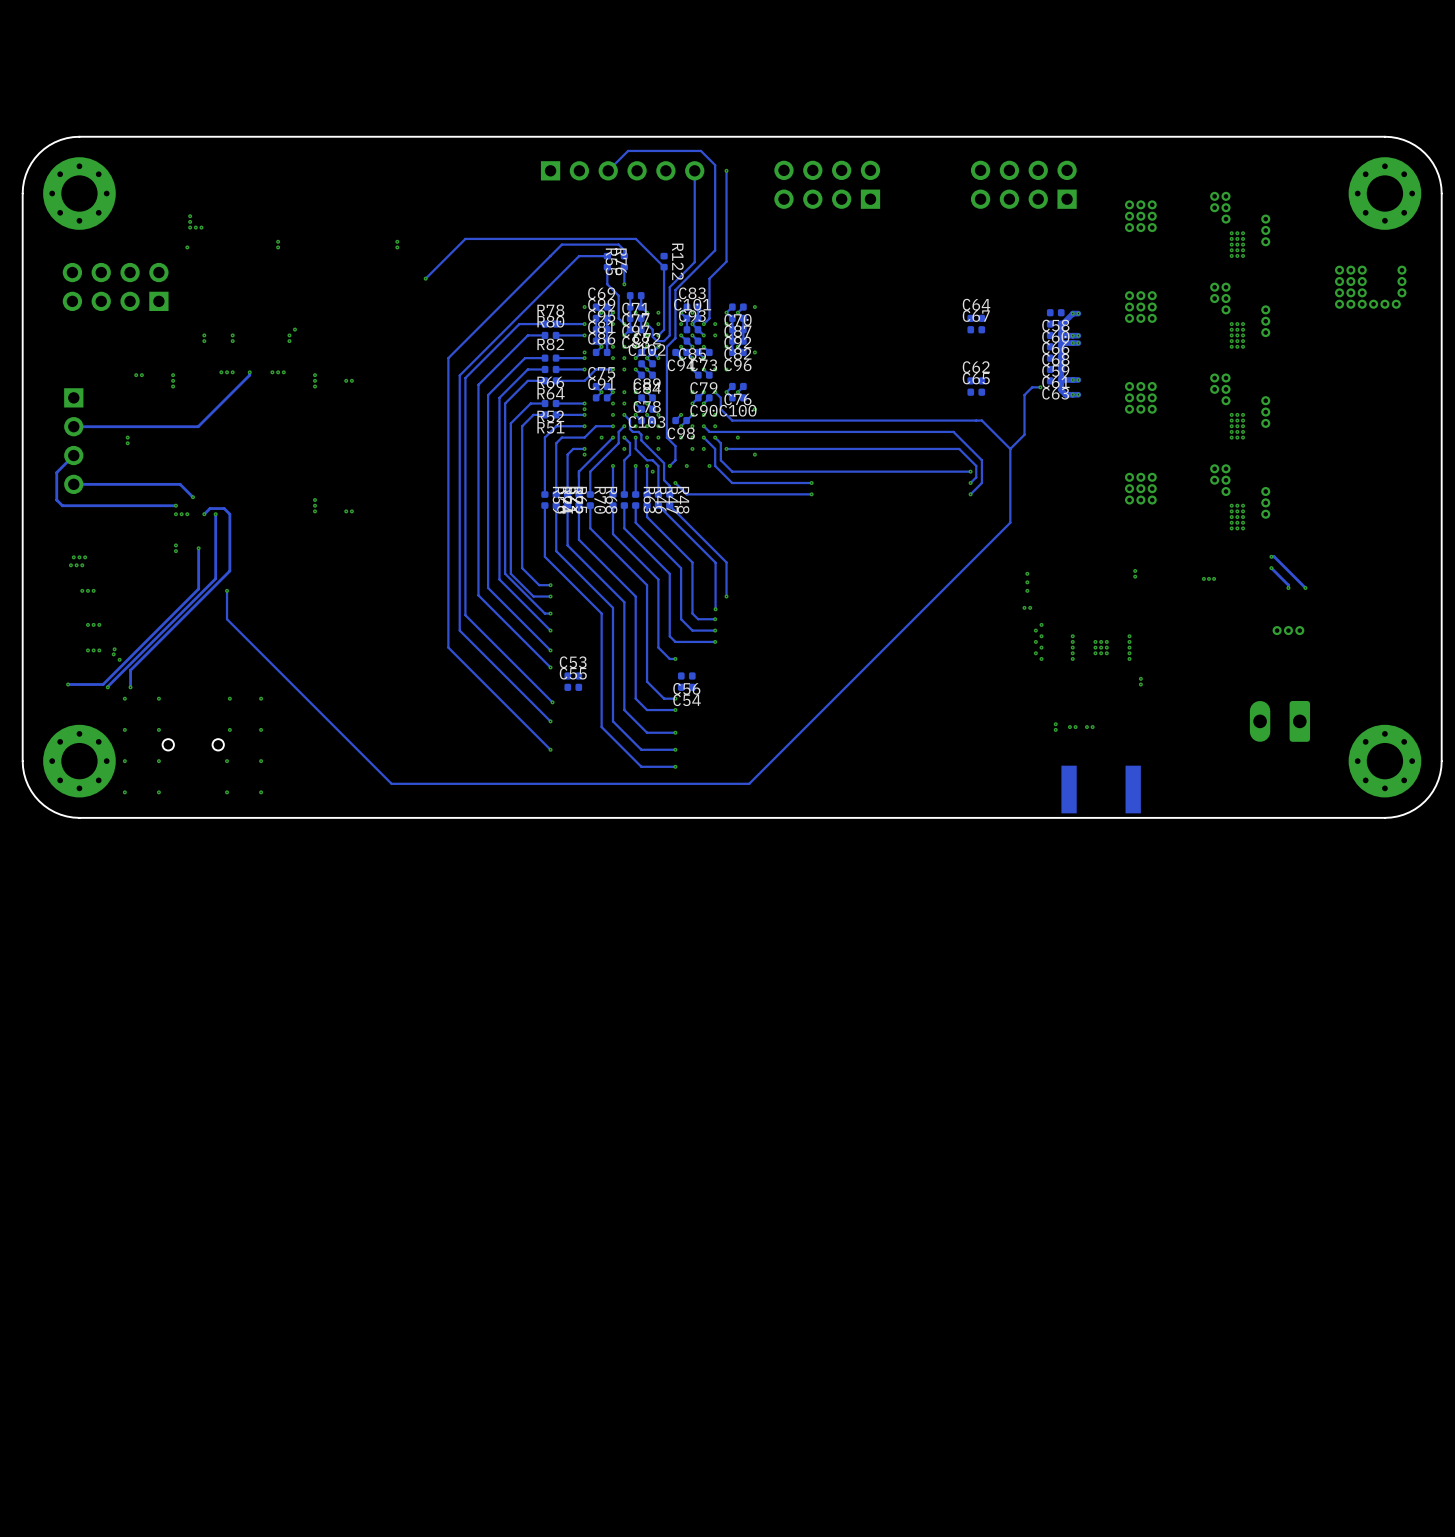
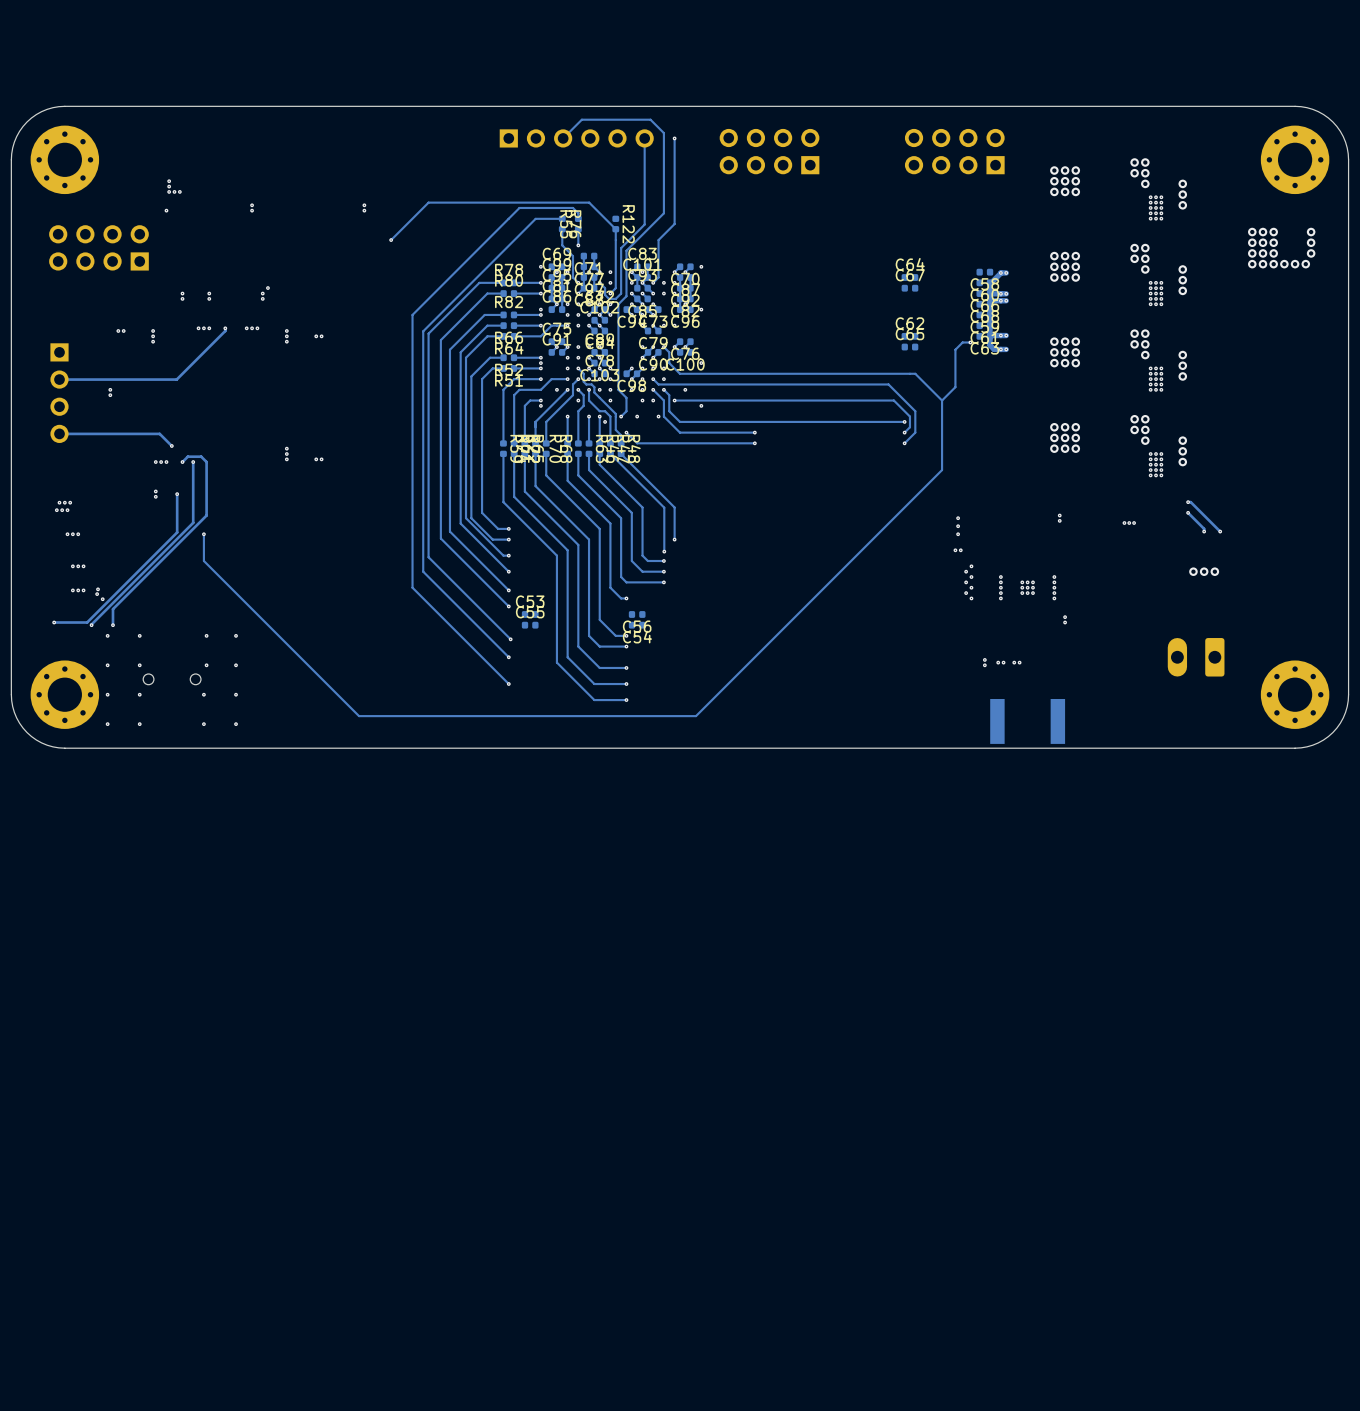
track: (73, 455) (56, 472) (56, 500) (62, 505) (175, 505) -> none
via: (175, 505) -> none

